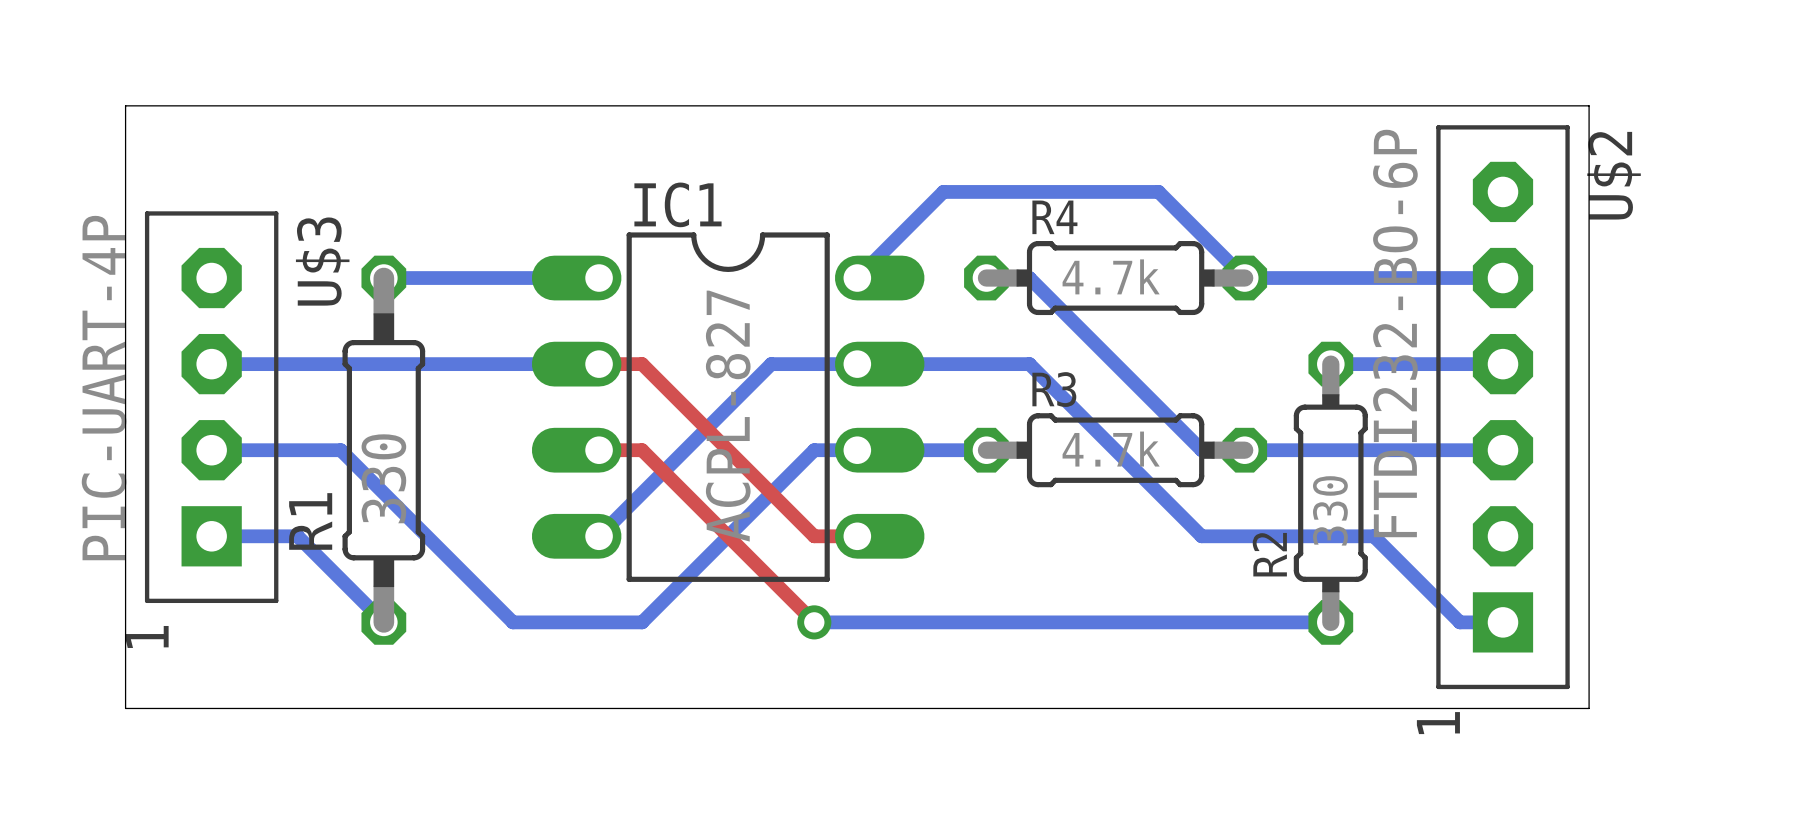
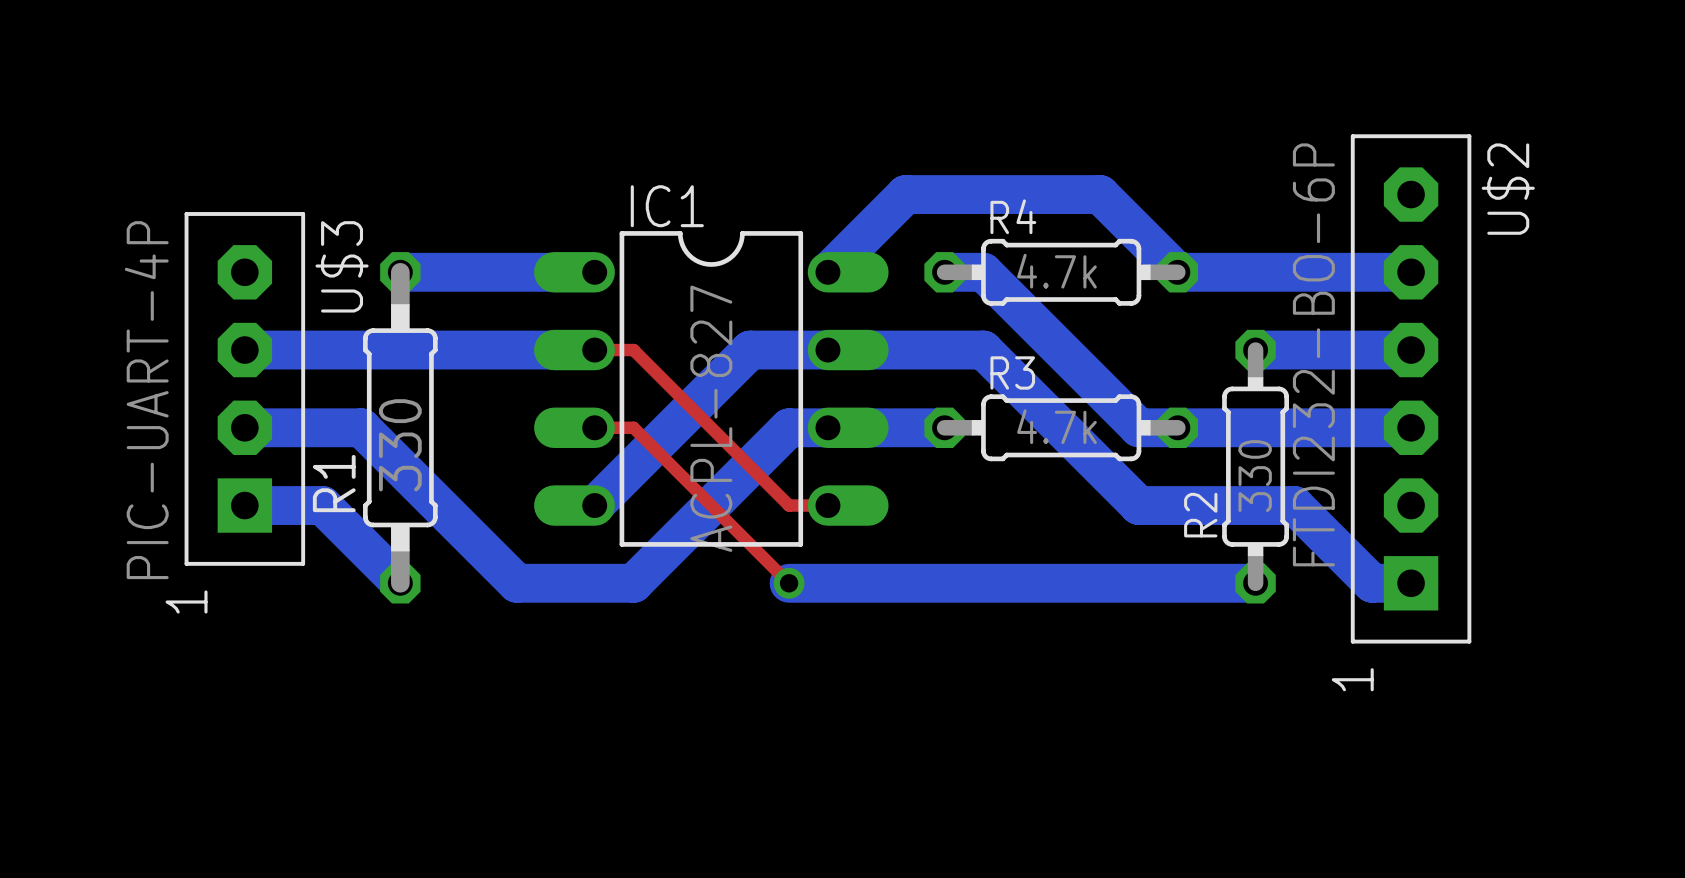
board edge: (125, 105) (1589, 105) (1589, 708) (125, 708) (125, 105) -> none
bottom track width: thin (383, 278) (599, 278) -> thick (400, 272) (594, 272)
bottom track width: thin (857, 278) (943, 191) (1158, 191) (1244, 278) (1502, 278) -> thick (827, 272) (905, 194) (1100, 194) (1177, 272) (1411, 272)
bottom track width: thin (986, 278) (1029, 278) (1201, 450) (1502, 450) -> thick (944, 272) (983, 272) (1138, 427) (1411, 427)
bottom track width: thin (211, 364) (599, 364) -> thick (244, 350) (594, 350)
bottom track width: thin (1330, 364) (1502, 364) -> thick (1255, 350) (1411, 350)
bottom track width: thin (211, 450) (340, 450) (512, 622) (642, 622) (814, 450) (986, 450) -> thick (244, 427) (361, 427) (516, 583) (633, 583) (789, 427) (944, 427)
bottom track width: thin (211, 536) (297, 536) (383, 622) -> thick (244, 505) (322, 505) (400, 583)
bottom track width: thin (599, 536) (771, 364) (1029, 364) (1201, 536) (1373, 536) (1459, 622) (1502, 622) -> thick (594, 505) (750, 350) (983, 350) (1138, 505) (1294, 505) (1372, 583) (1411, 583)
bottom track width: thin (814, 622) (1330, 622) -> thick (789, 583) (1255, 583)

